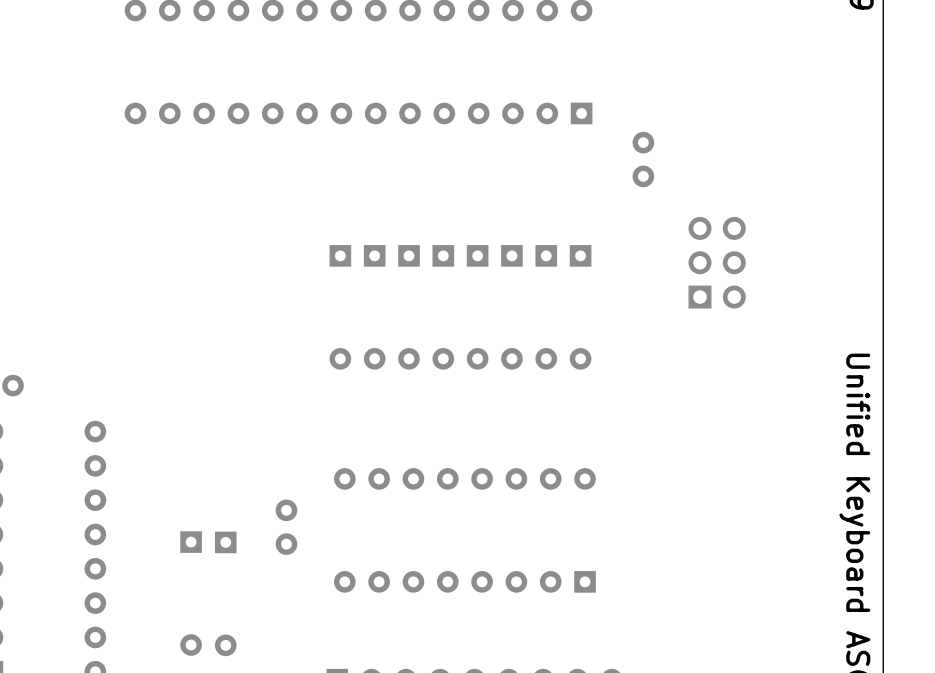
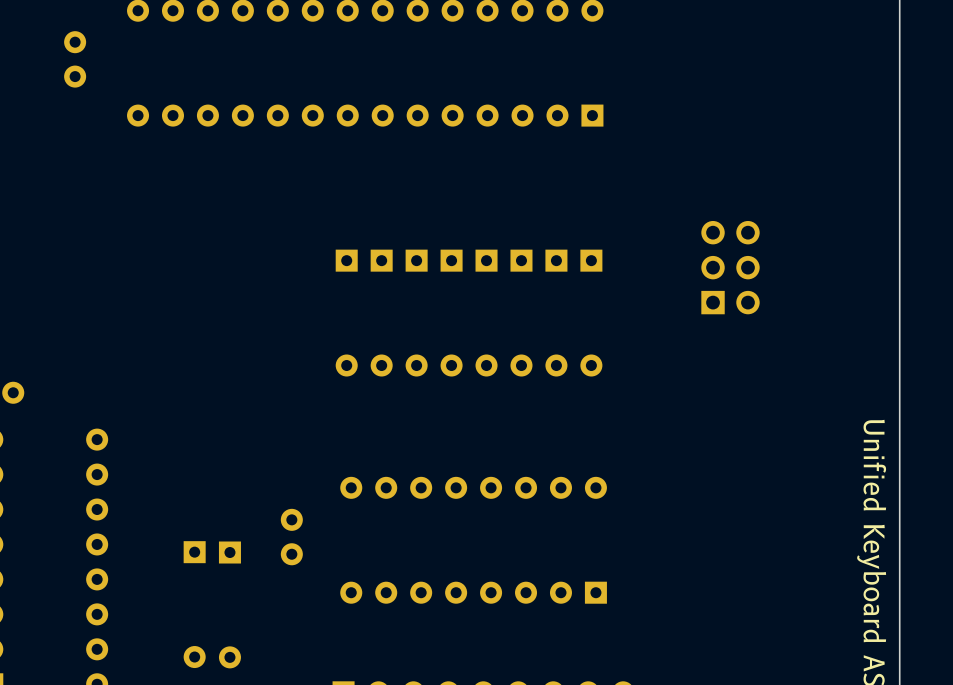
part: none -> (75, 59)
part: (643, 159) -> none

